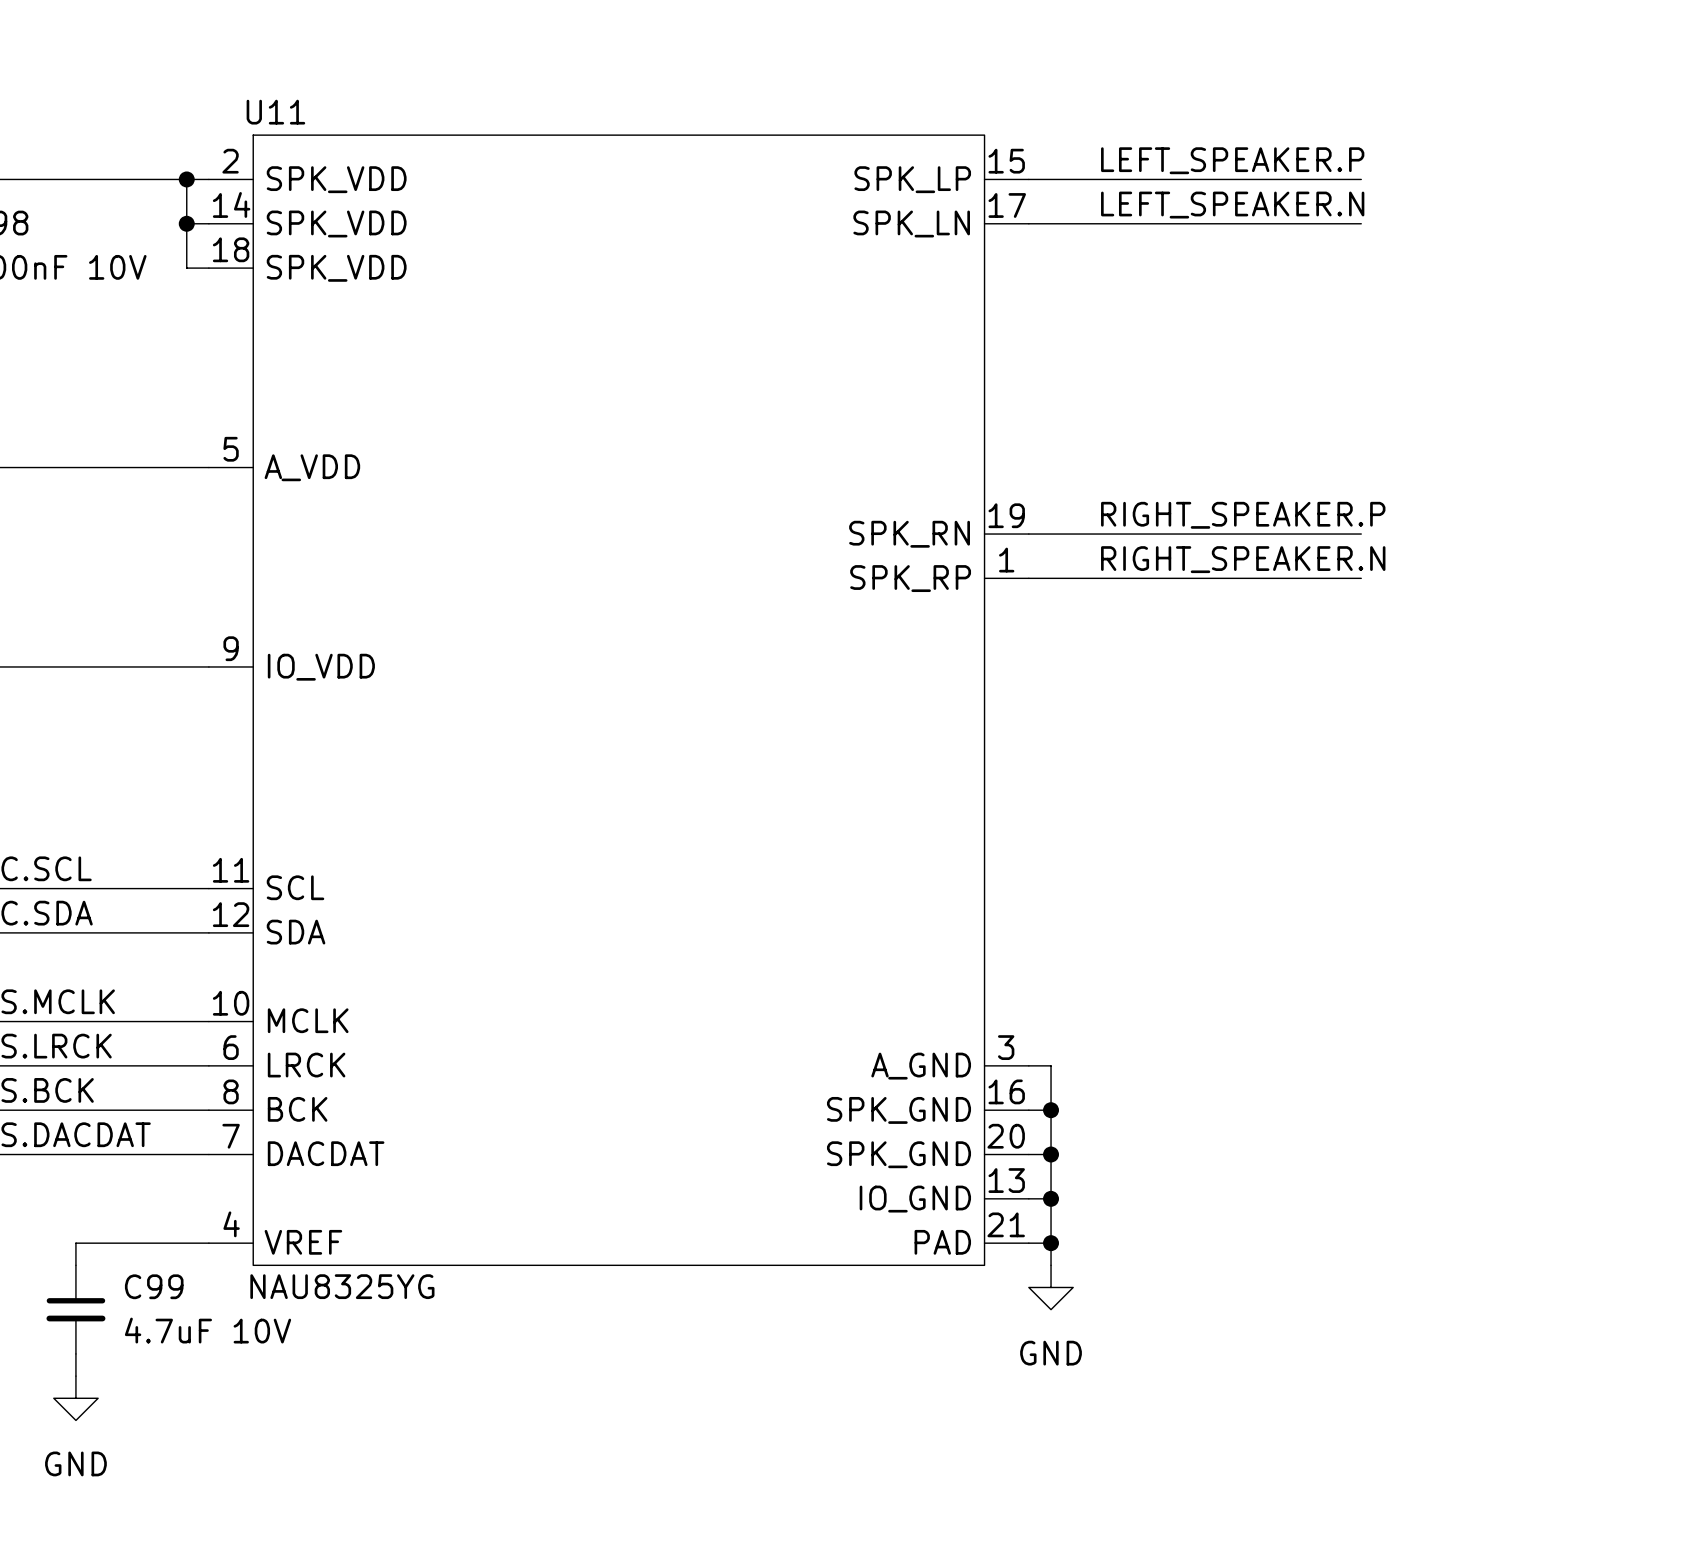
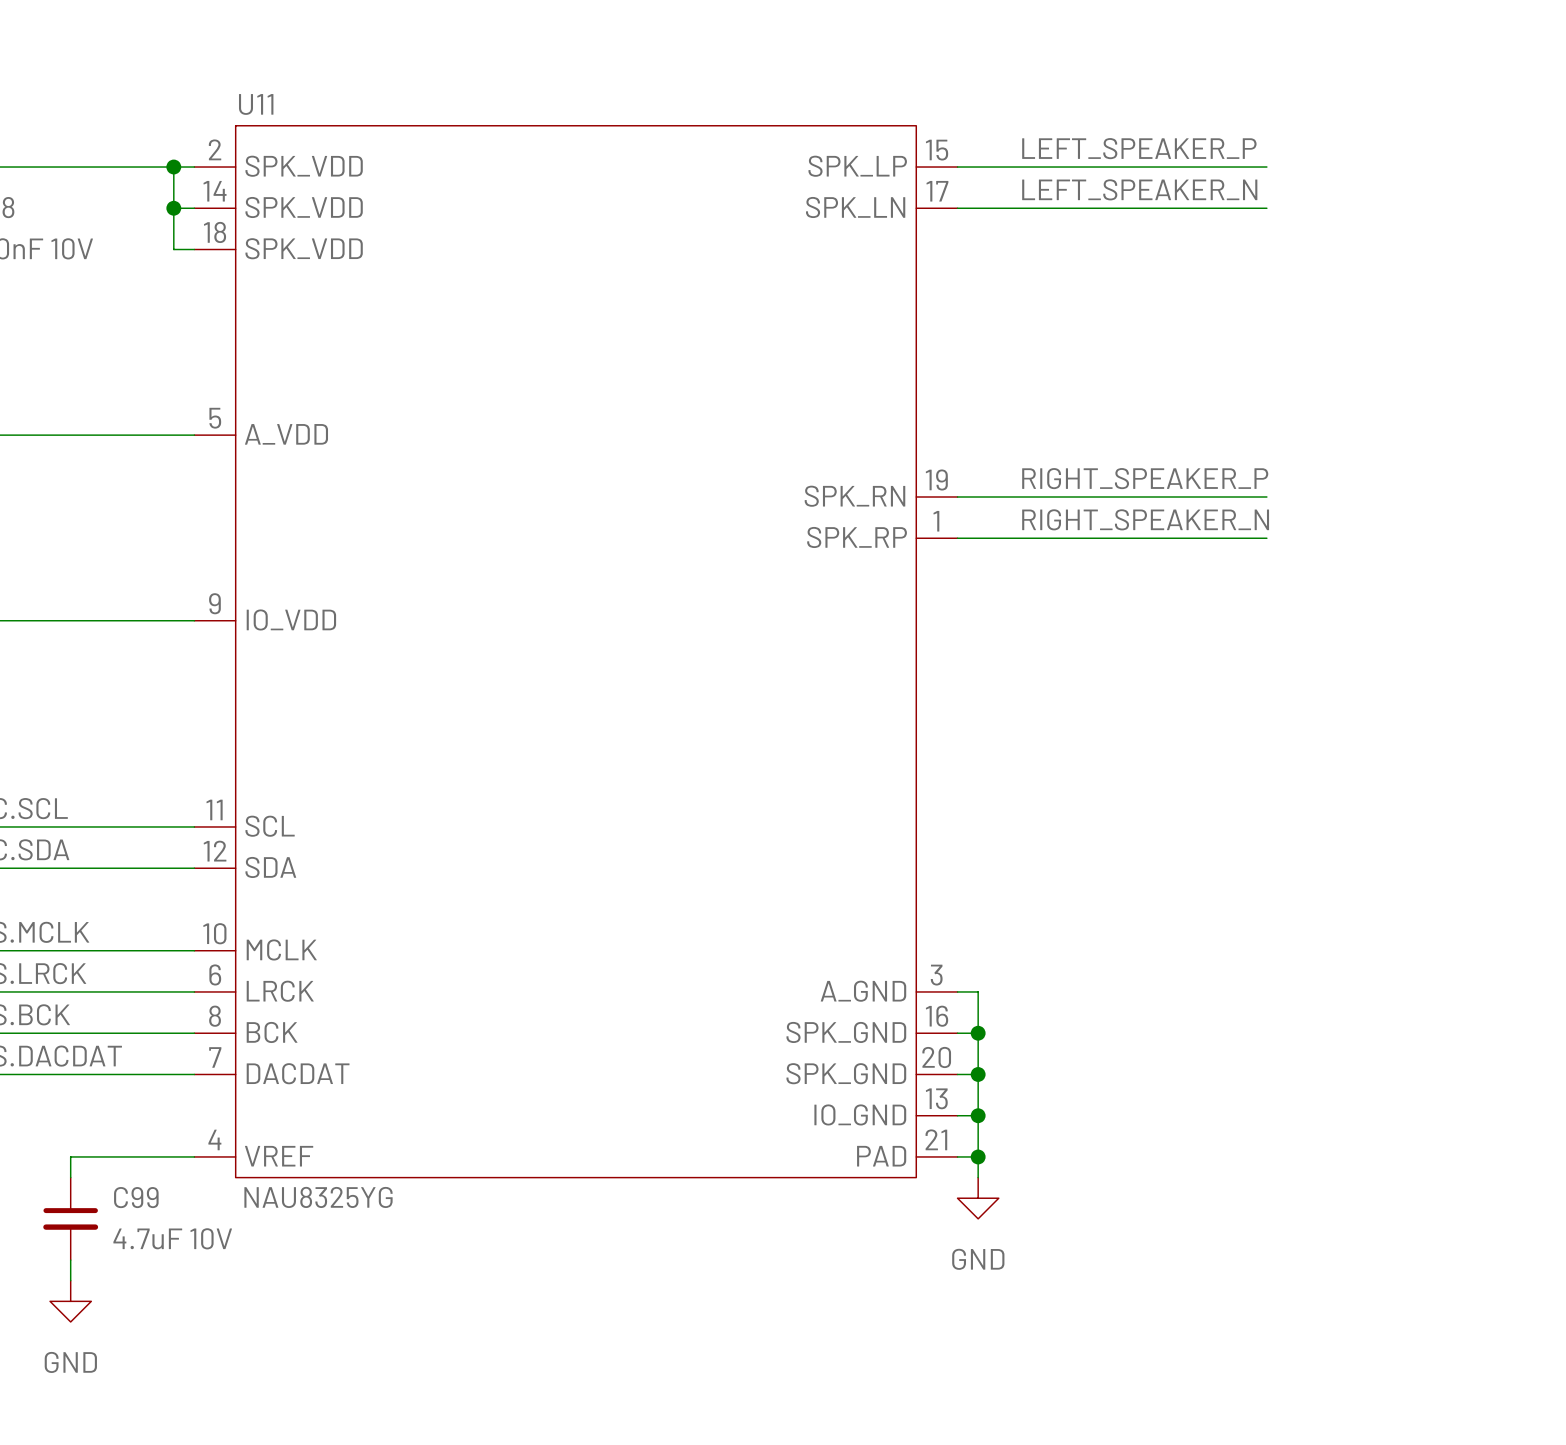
label: LEFT_SPEAKER.P (1232, 160) -> LEFT_SPEAKER_P (1139, 148)
label: LEFT_SPEAKER.N (1232, 205) -> LEFT_SPEAKER_N (1139, 189)
label: RIGHT_SPEAKER.P (1243, 515) -> RIGHT_SPEAKER_P (1145, 478)
label: RIGHT_SPEAKER.N (1243, 559) -> RIGHT_SPEAKER_N (1145, 519)

